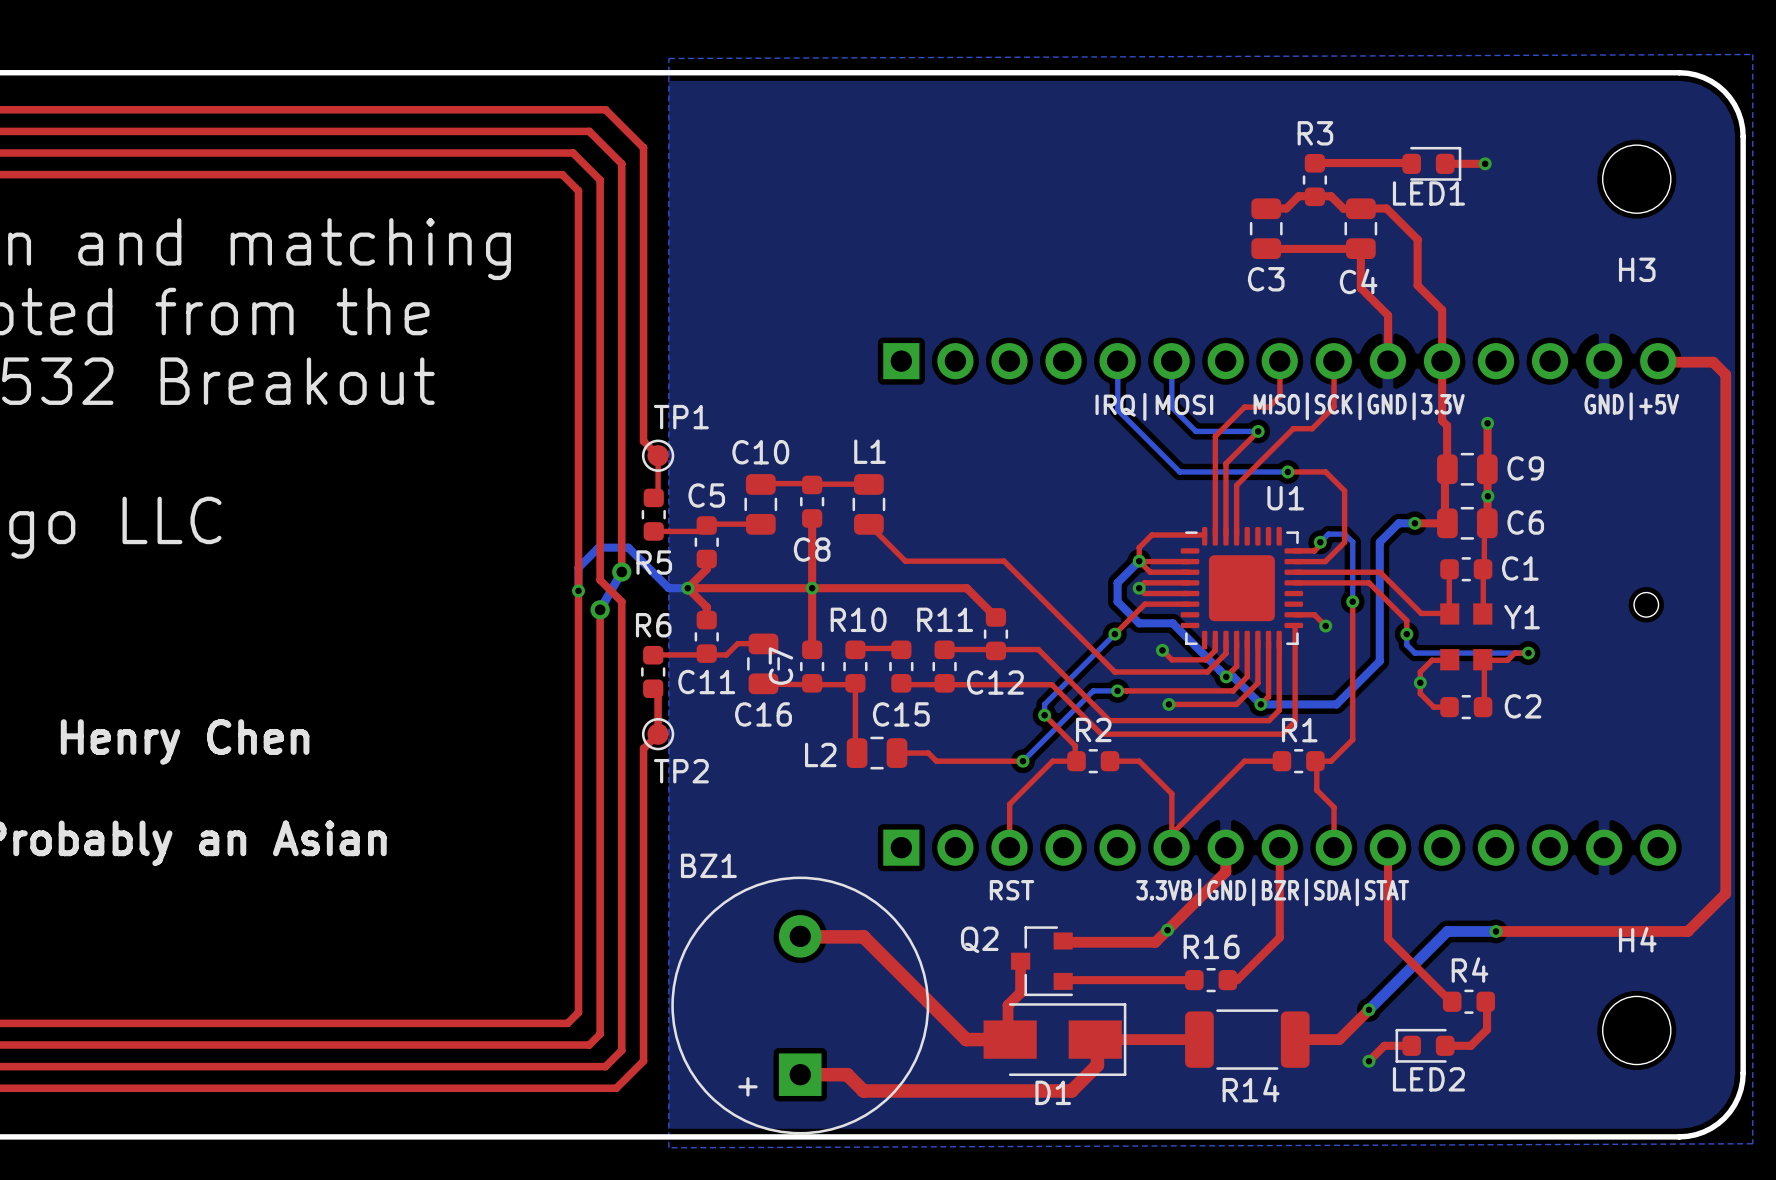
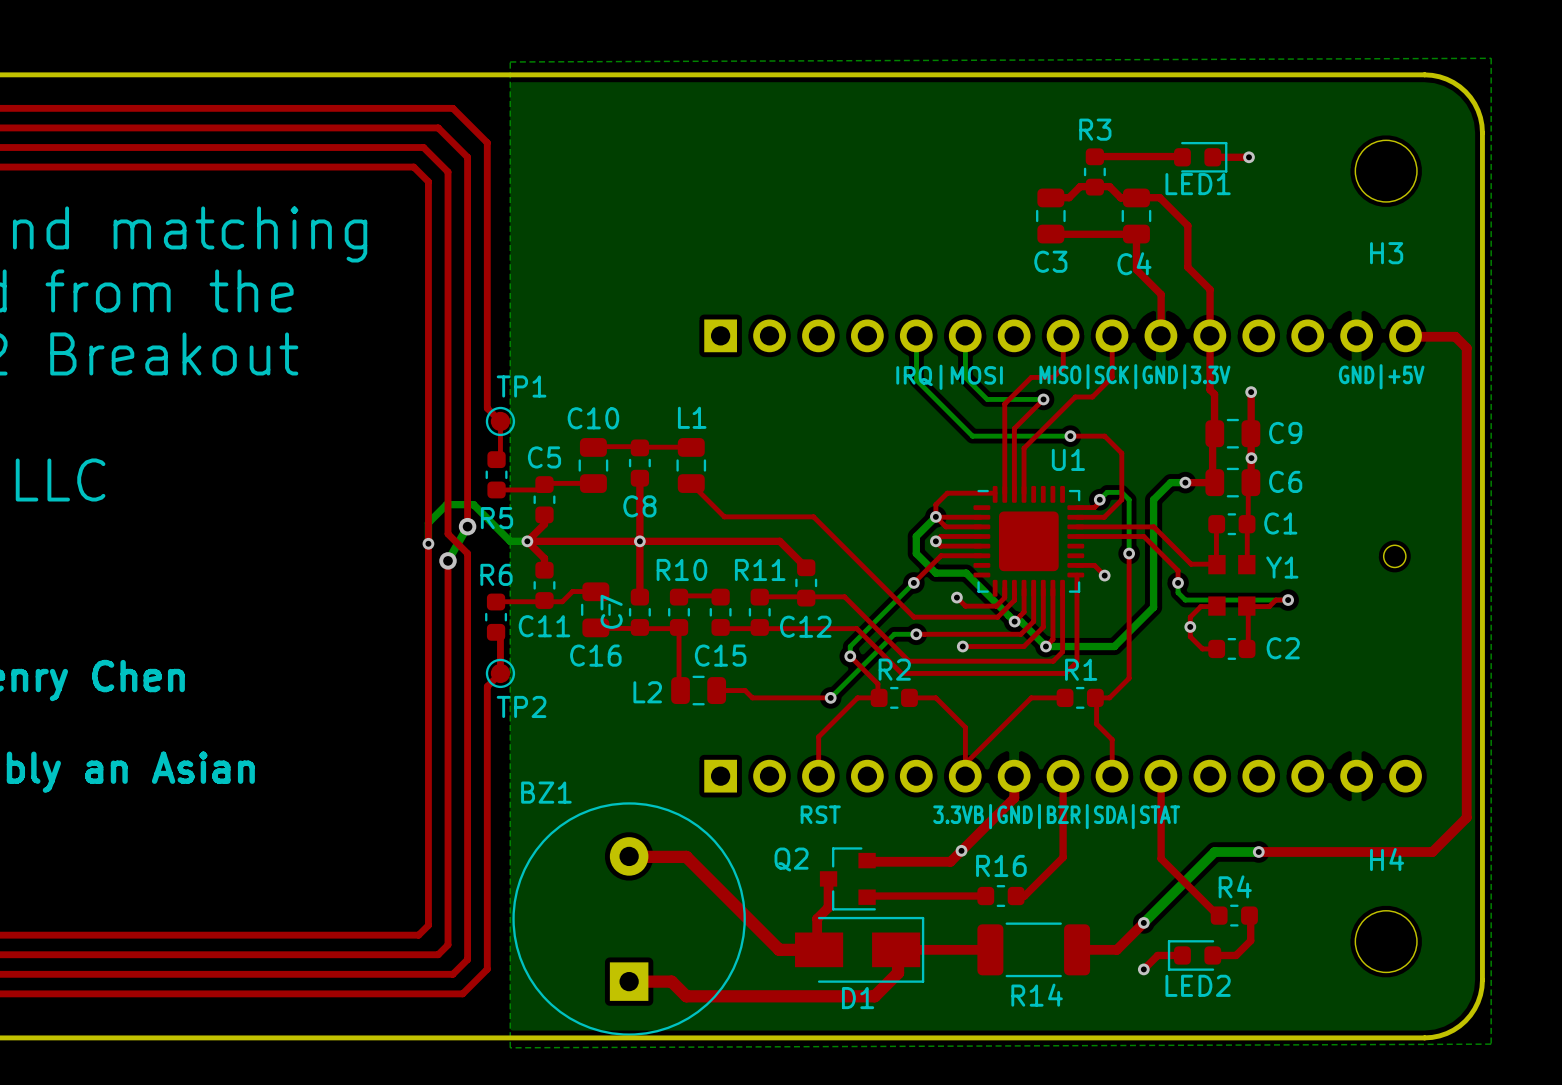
BZ1 text: + (747, 1086) -> none

